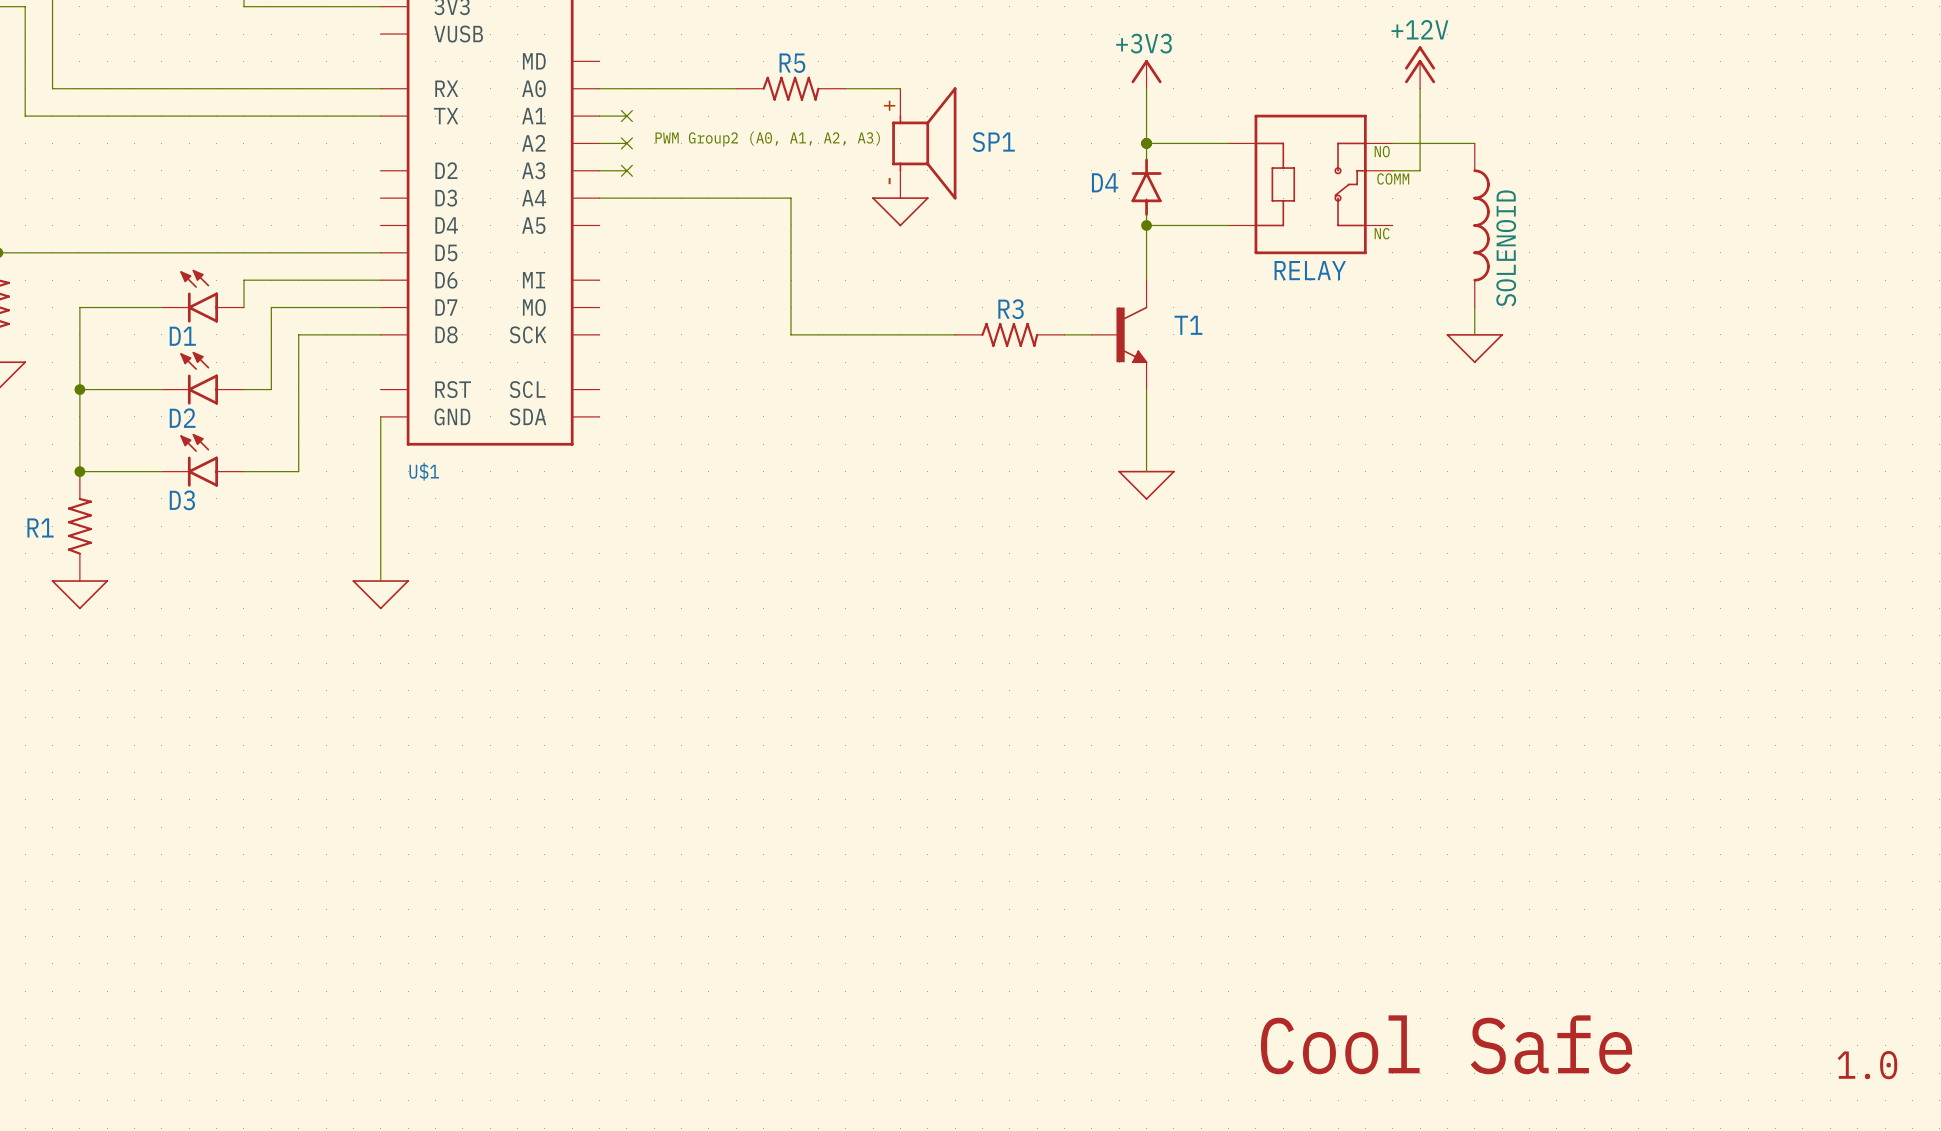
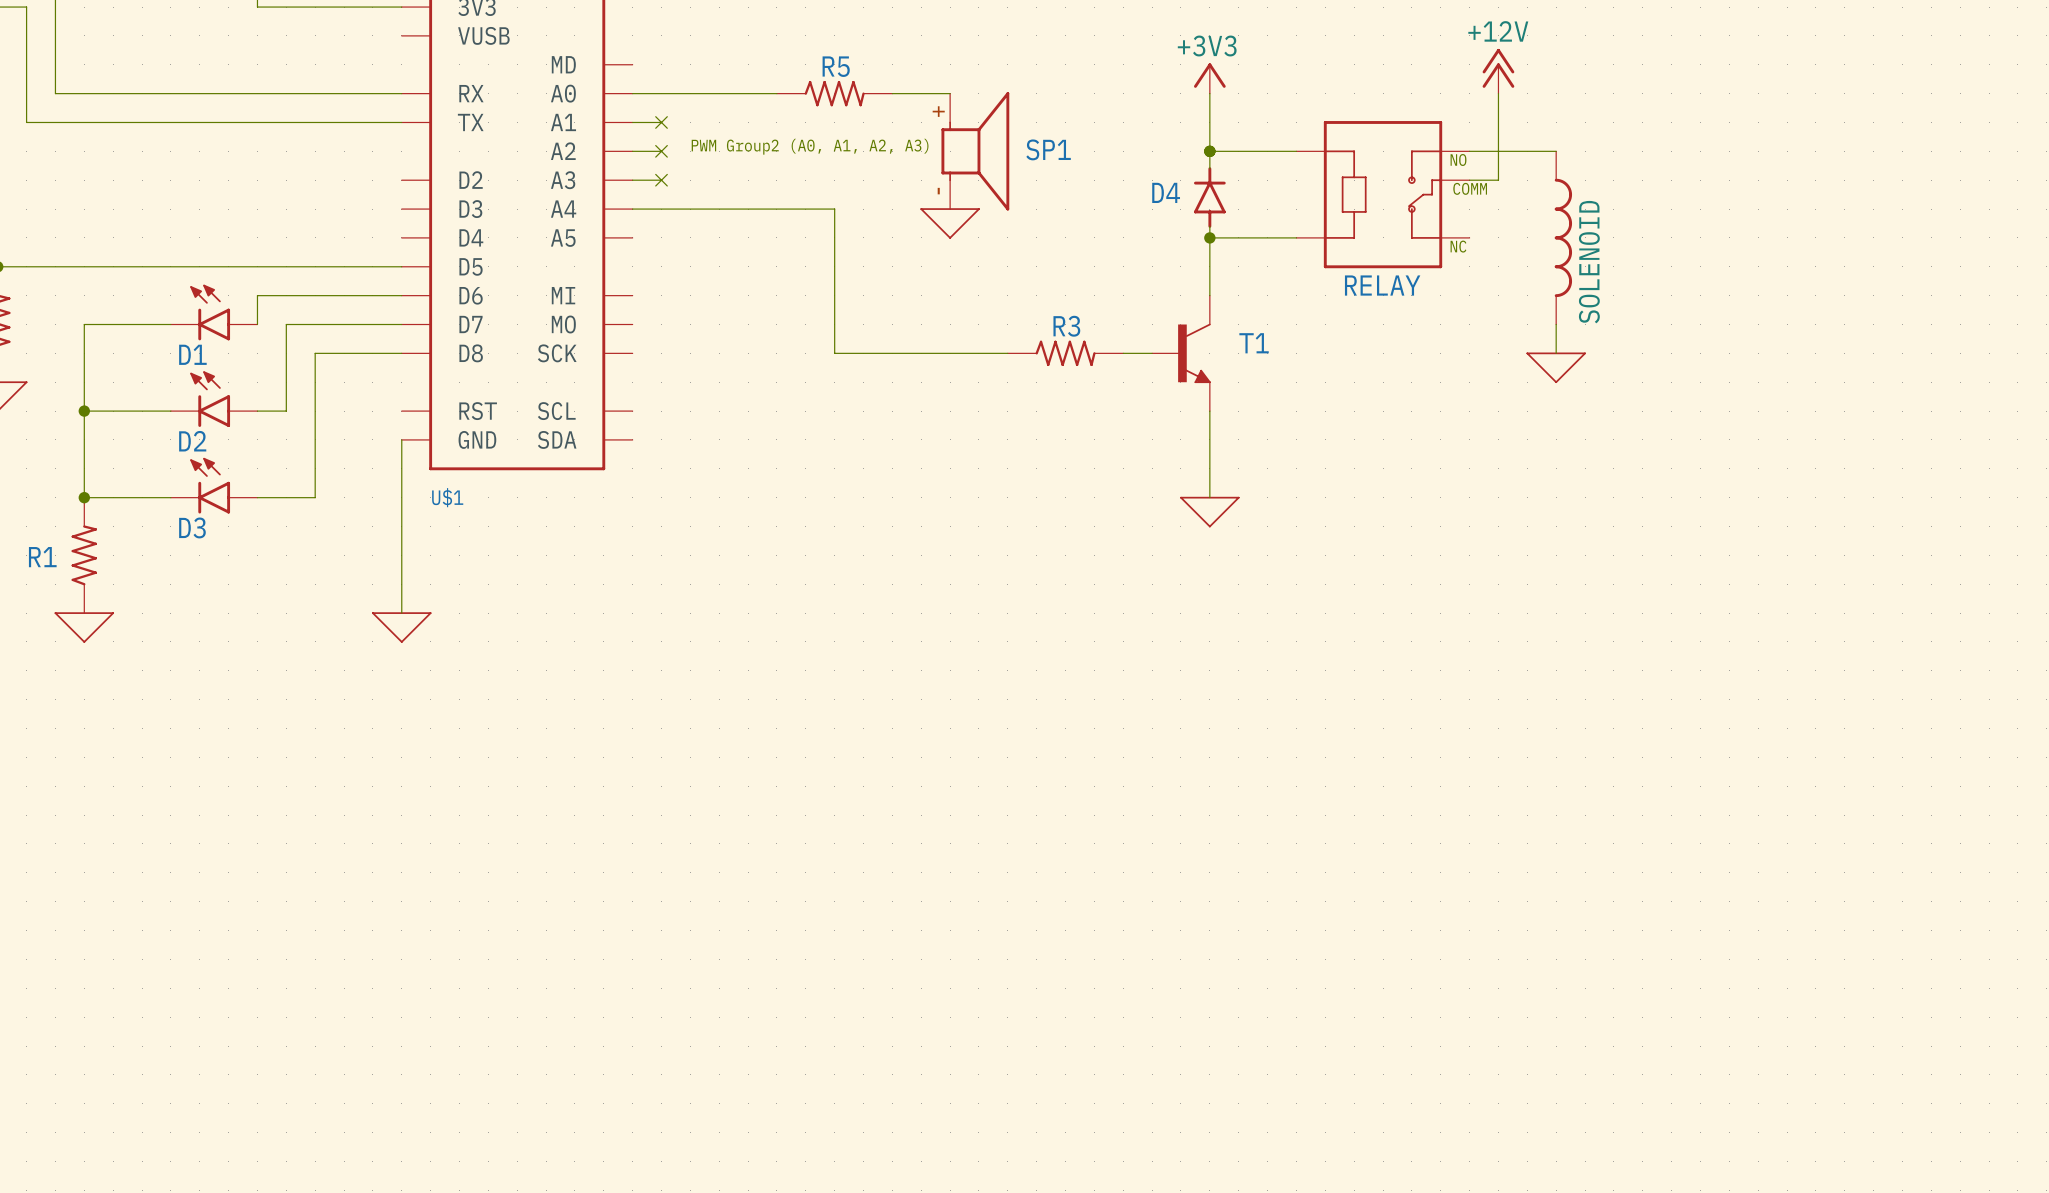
text: Cool Safe (1446, 1044) -> none
text: 1.0 (1867, 1065) -> none

